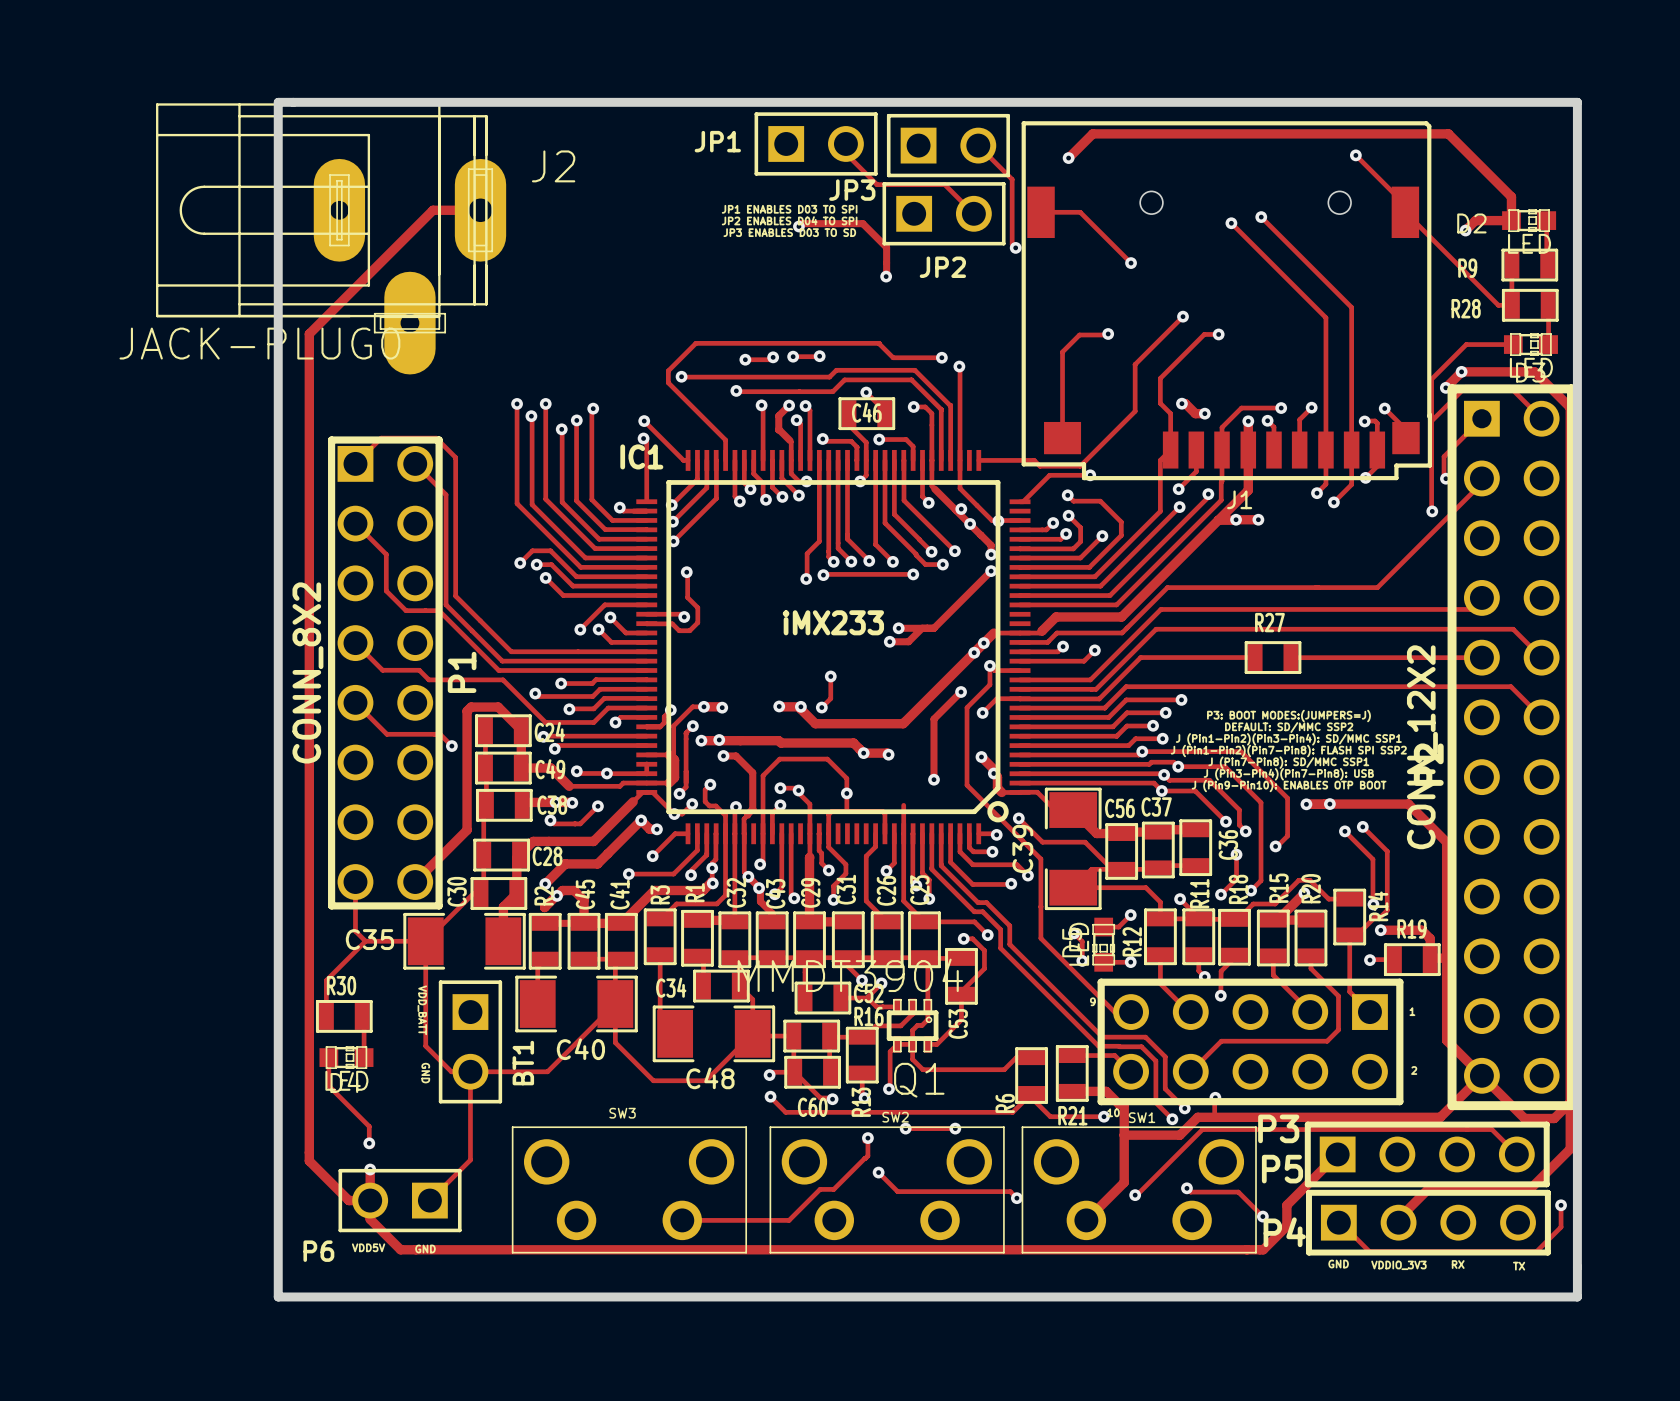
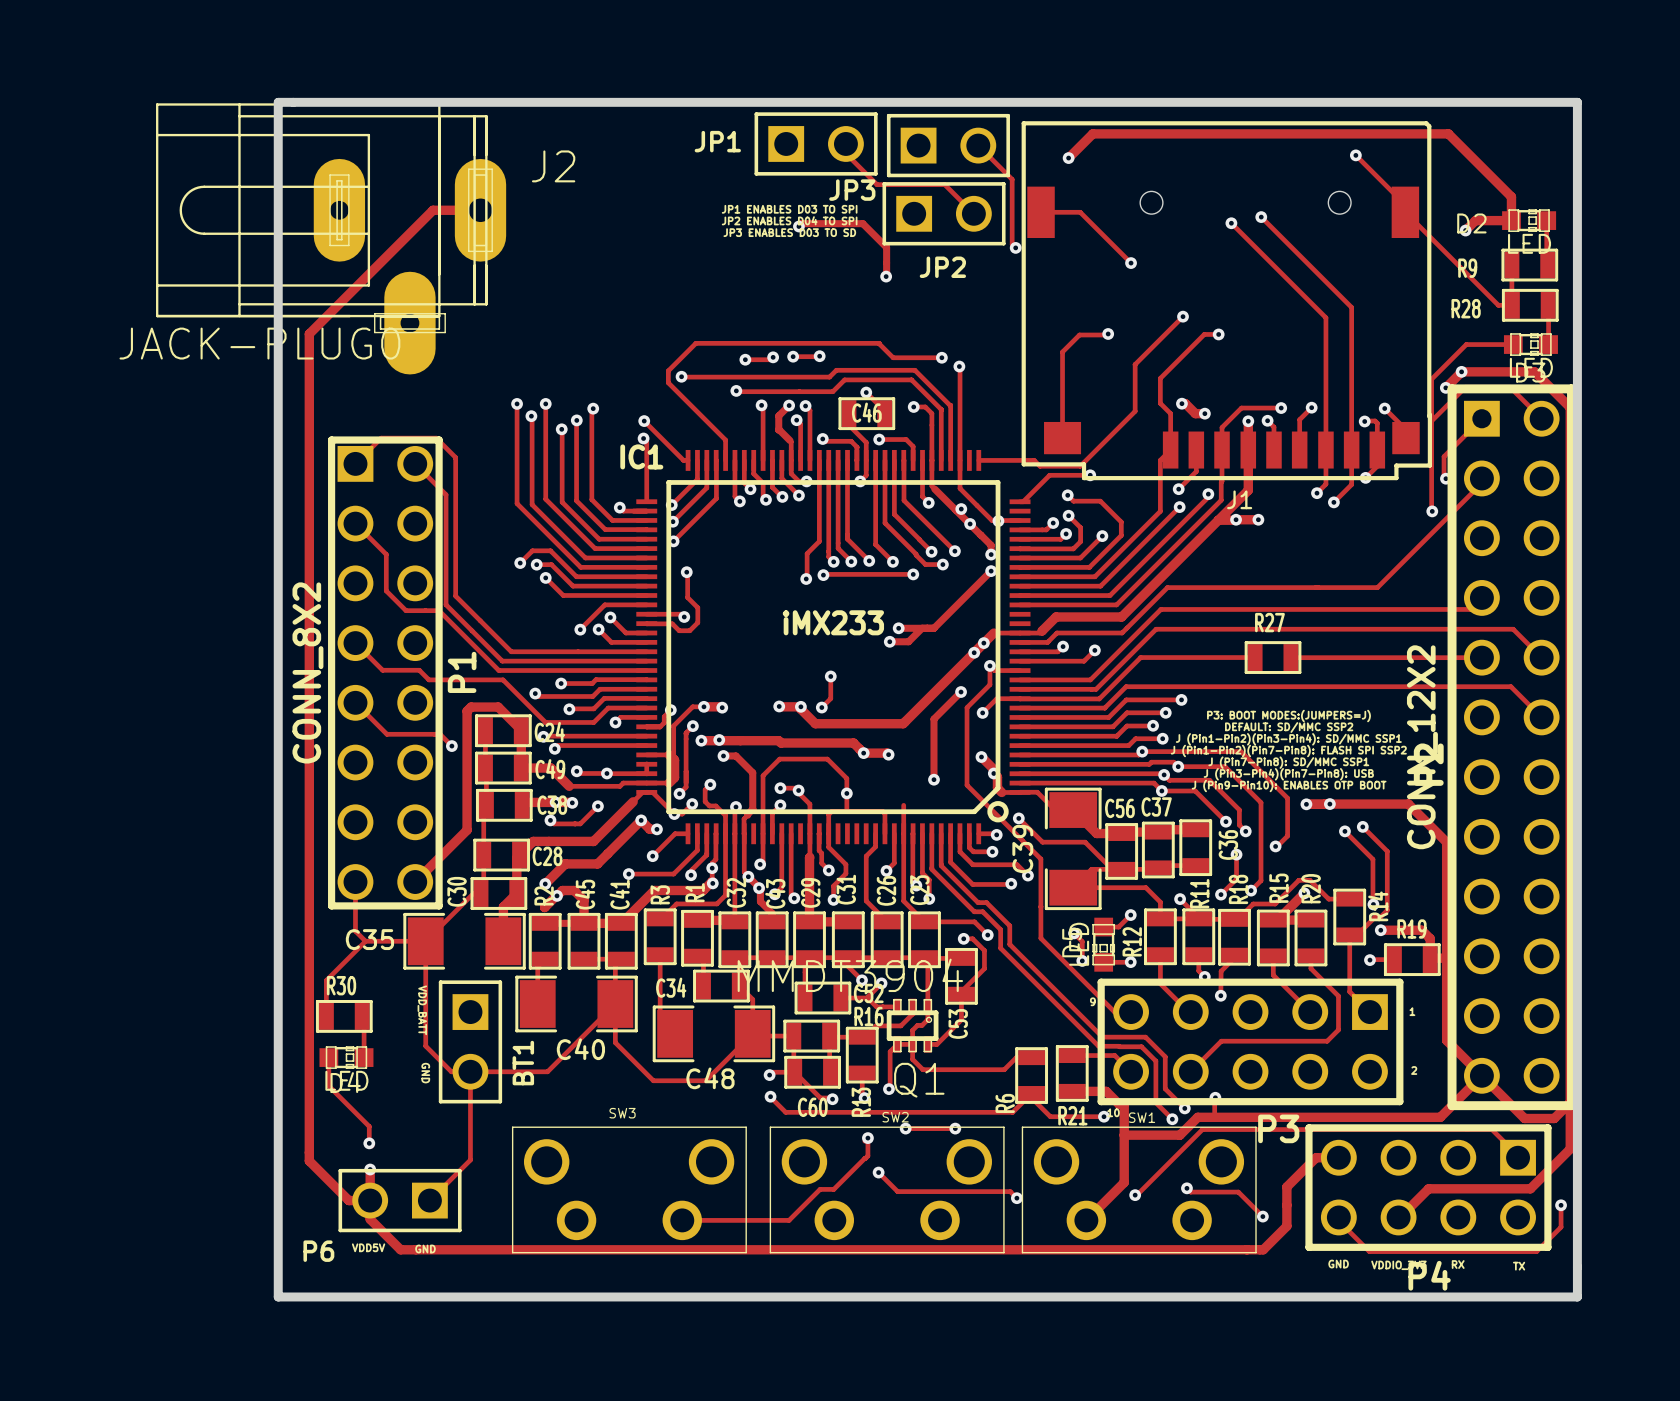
track: (1337, 1154) (1286, 1205) -> (1338, 1157) (1316, 1157) (1286, 1186) (1286, 1205)
P5: (1427, 1154) -> none
P4 footprint: [1306, 1189, 1551, 1256] -> [1305, 1124, 1552, 1251]
P4 name position: P4 (1284, 1232) -> P4 (1429, 1275)

